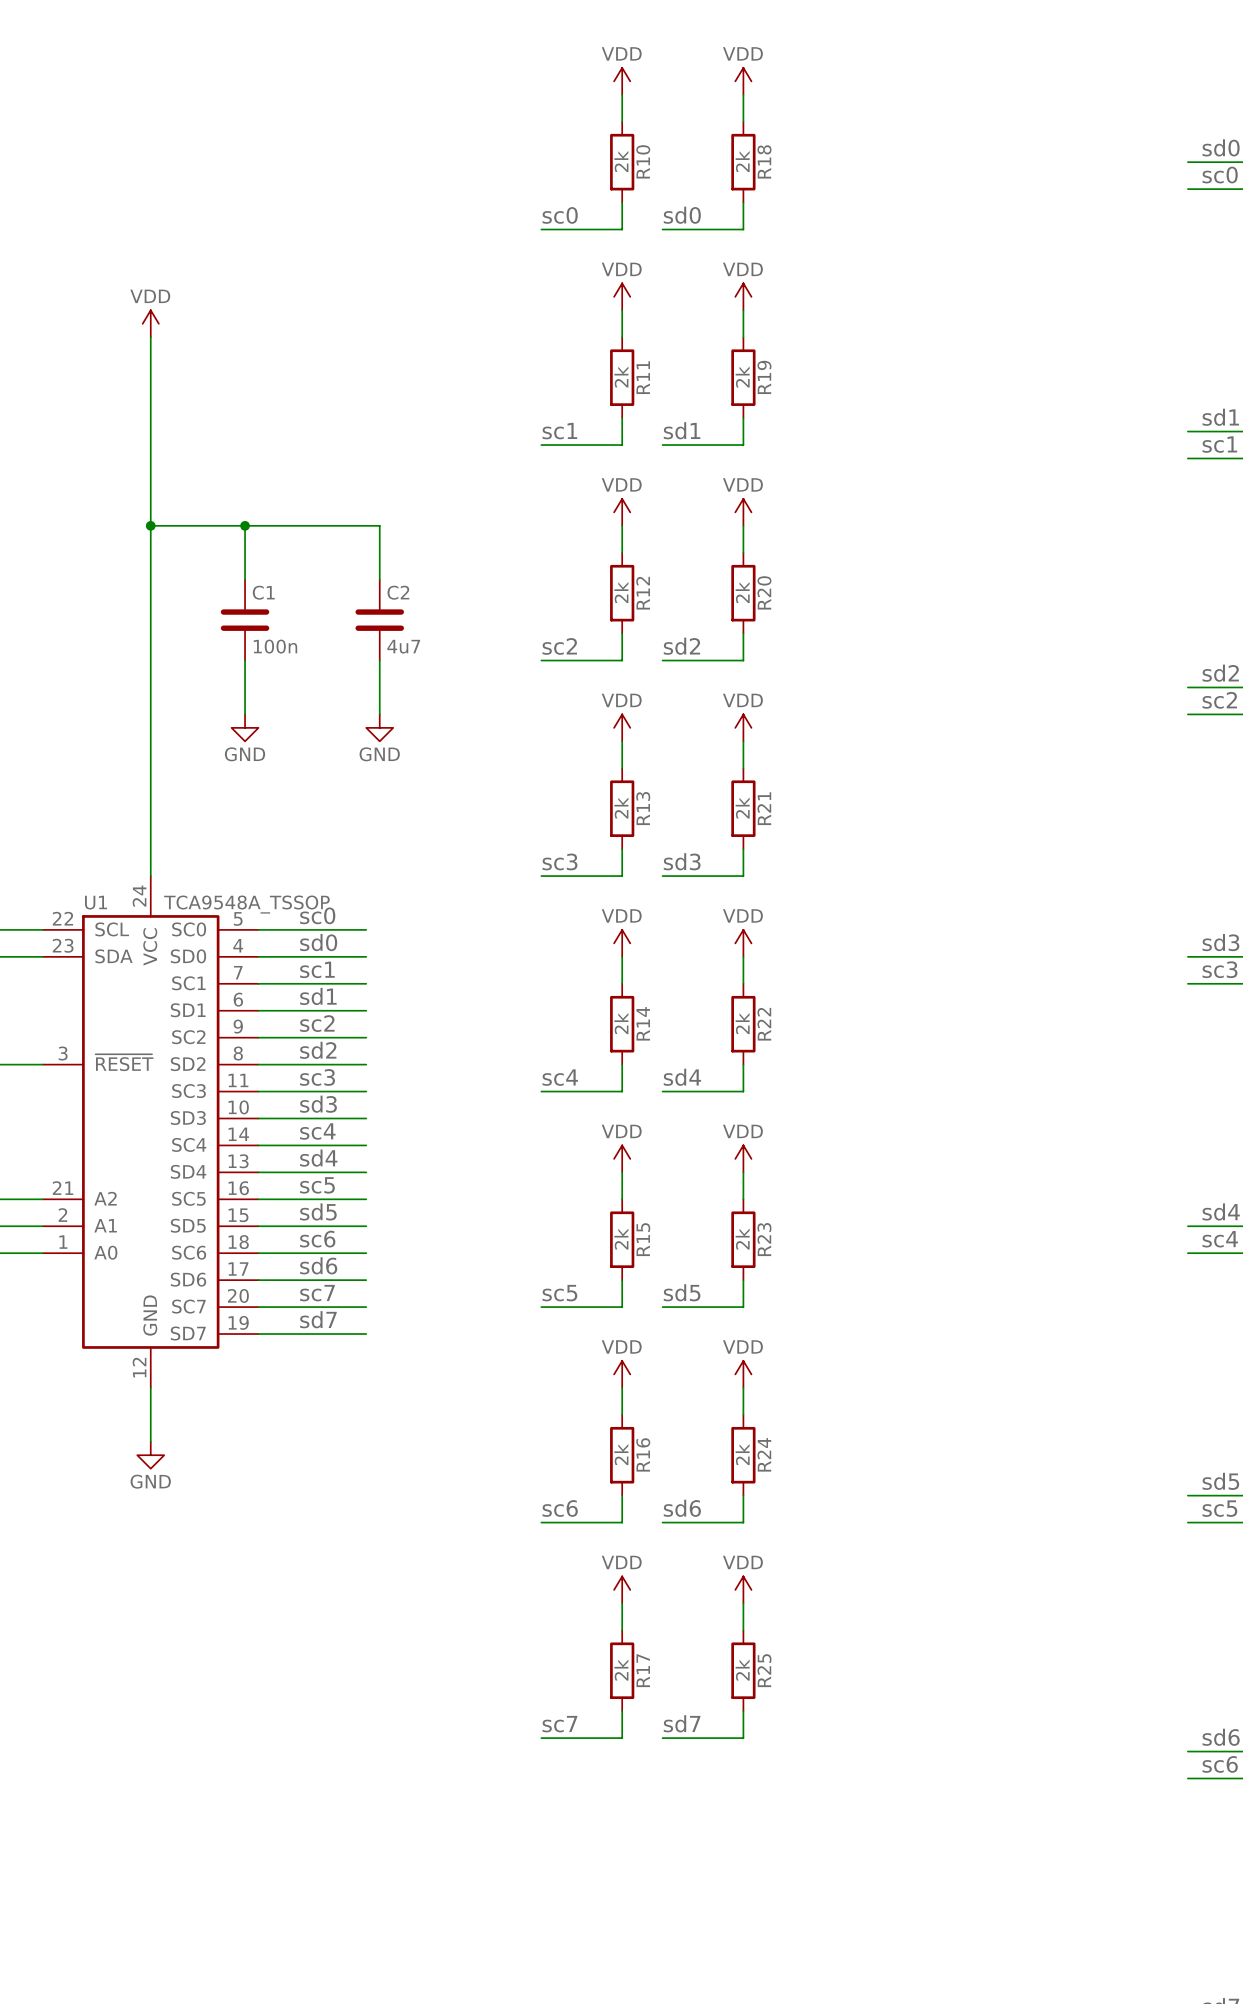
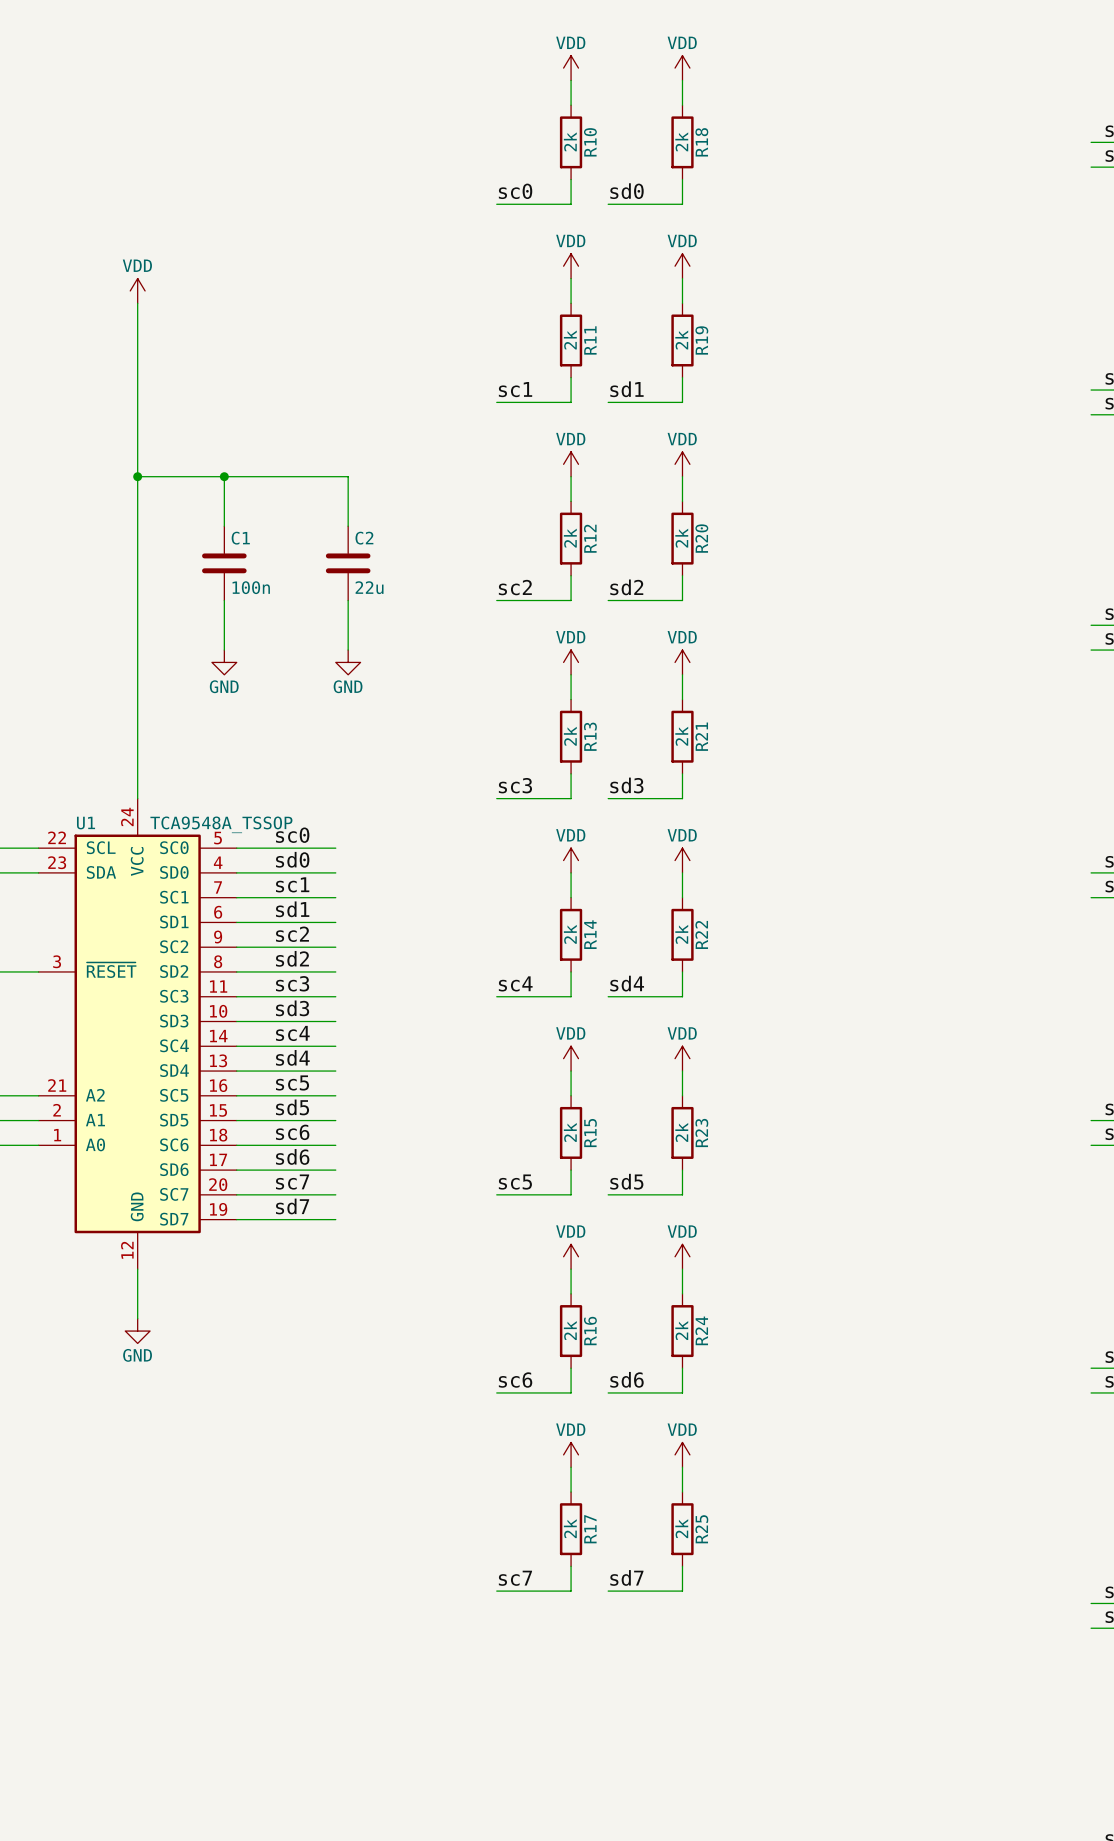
C2 value: 4u7 (403, 646) -> 22u (369, 587)

